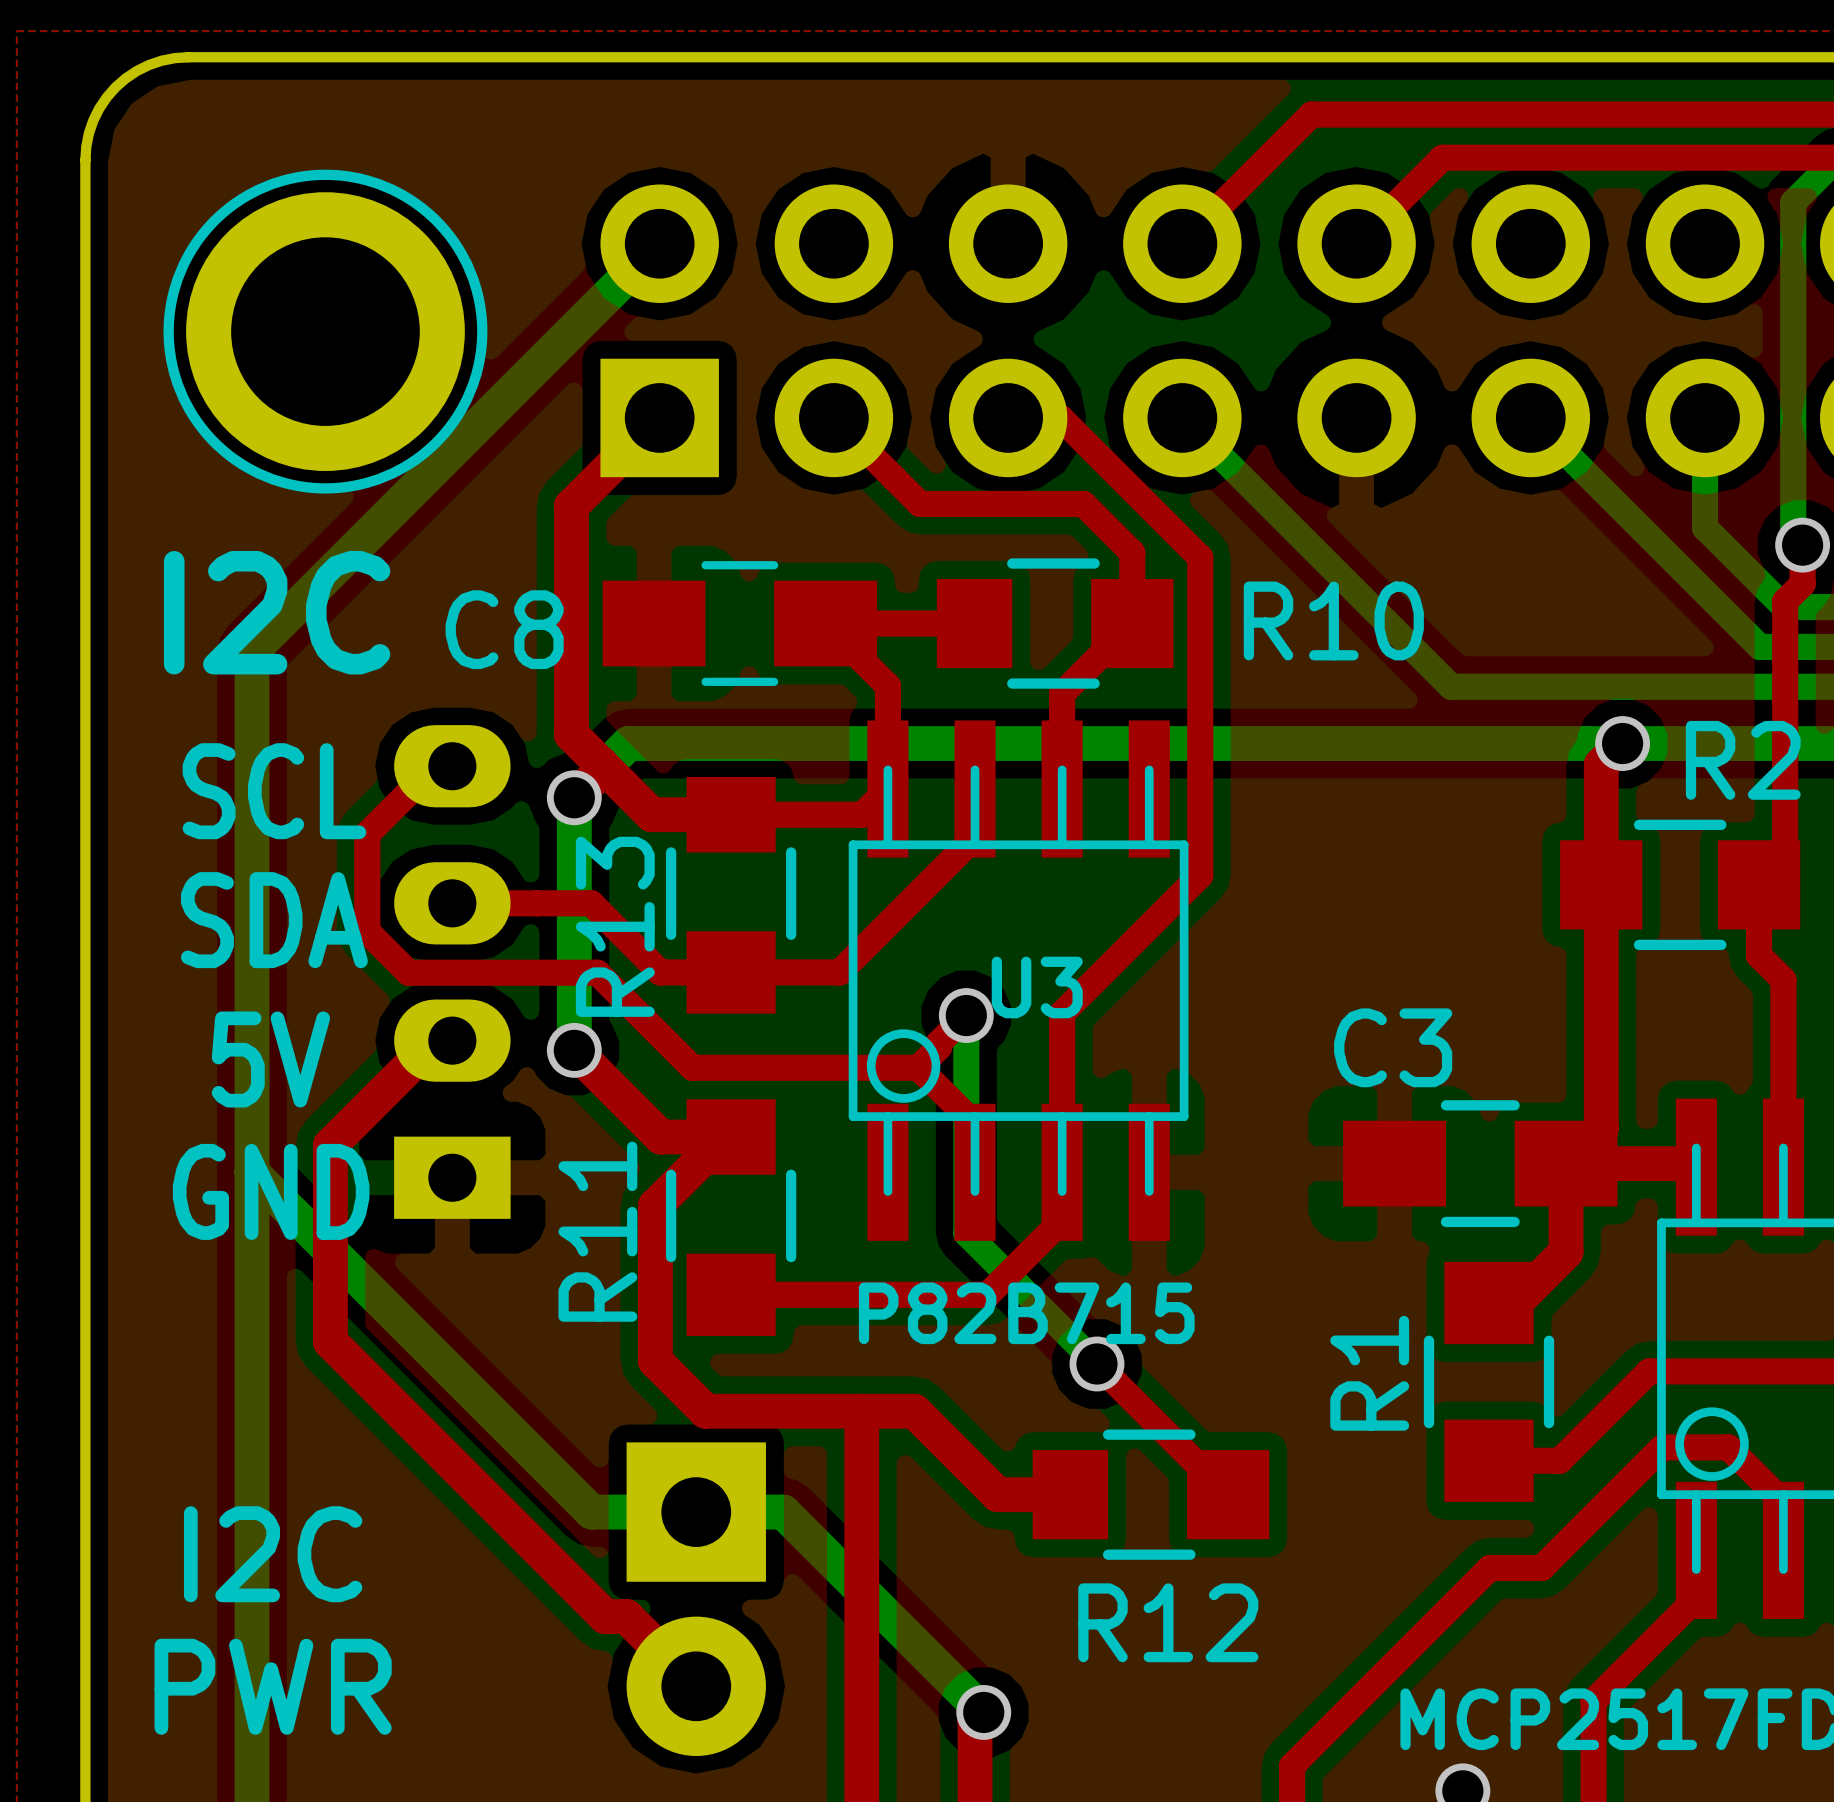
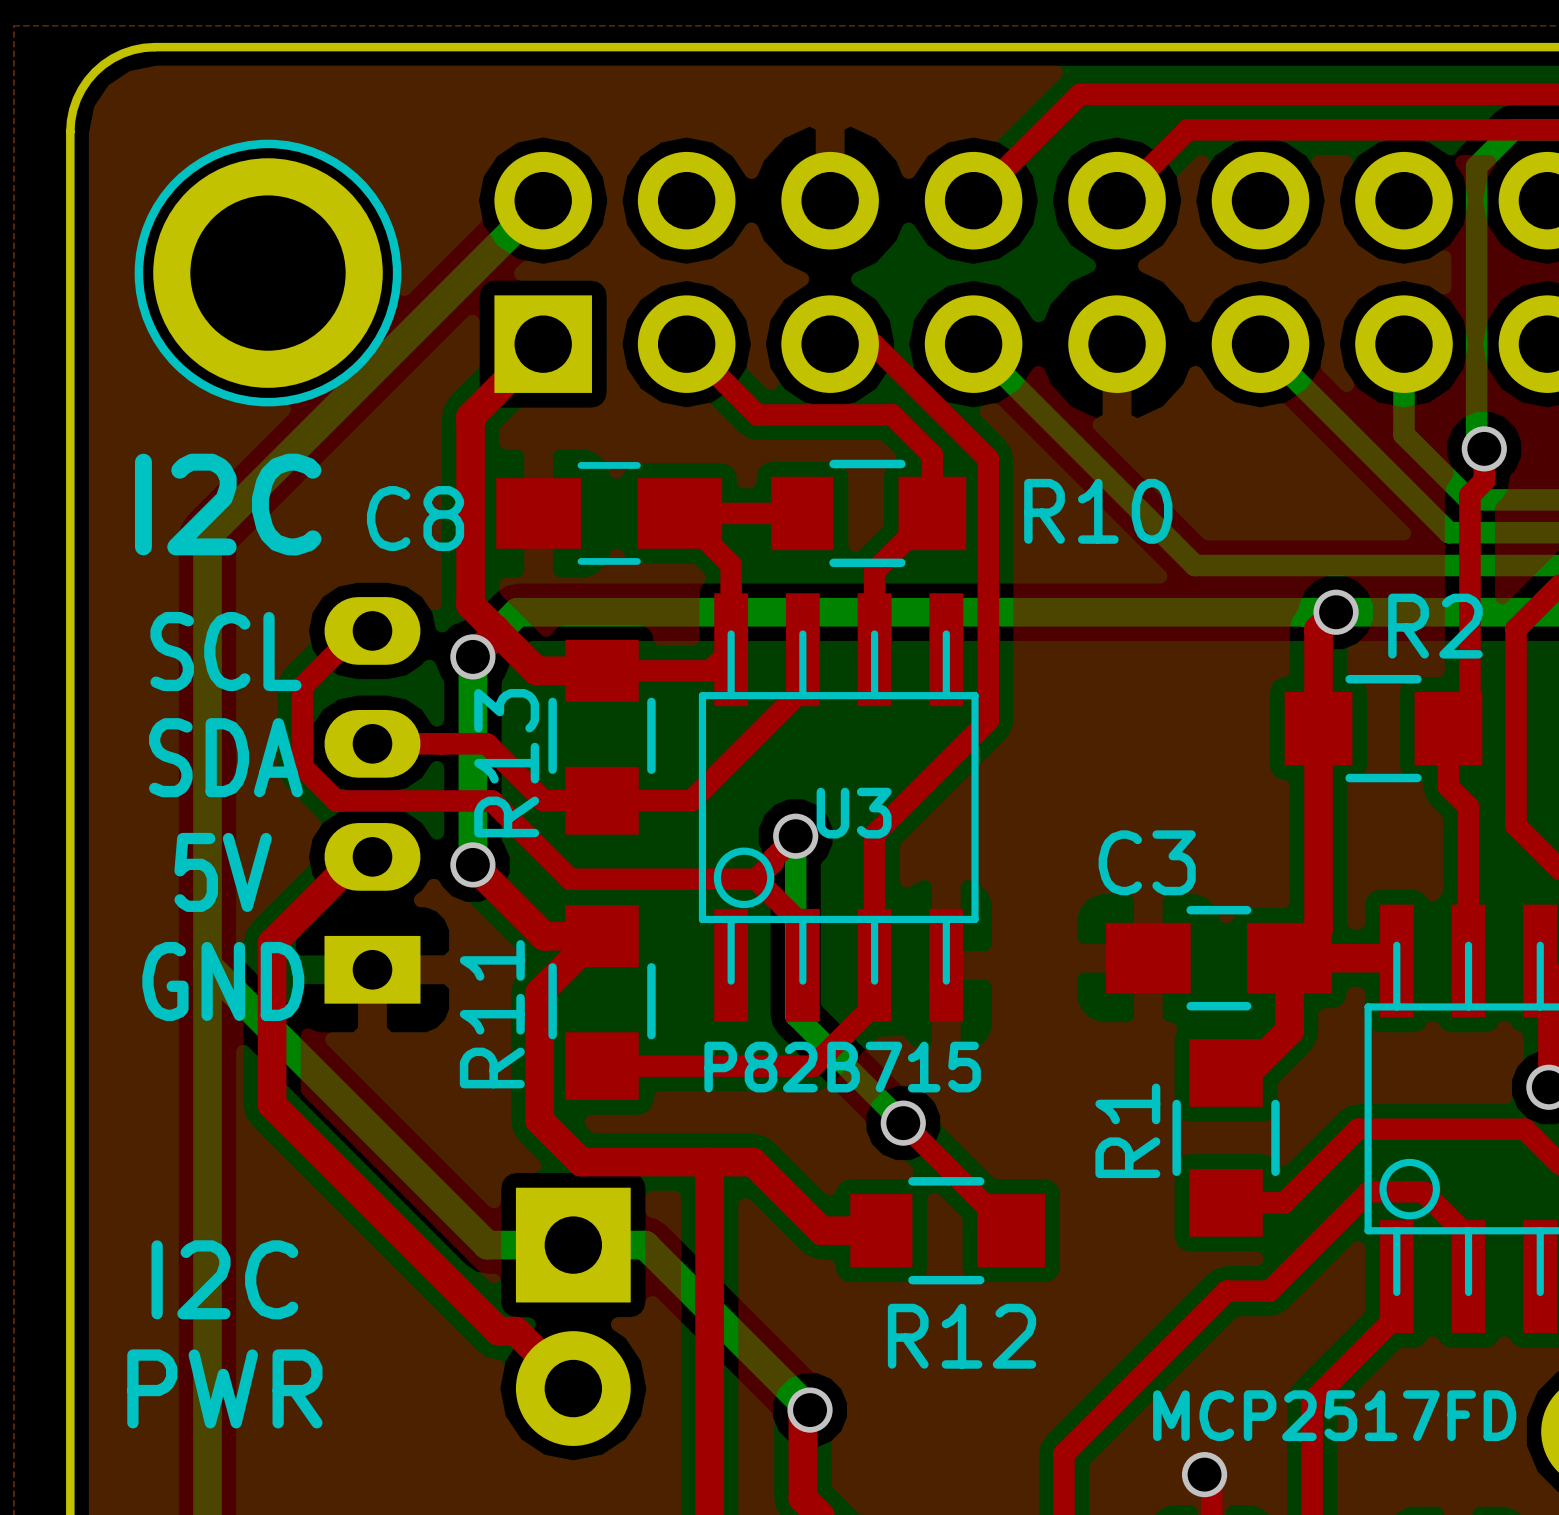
U3 value position: P82B715 (1026, 1313) -> P82B715 (842, 1067)

